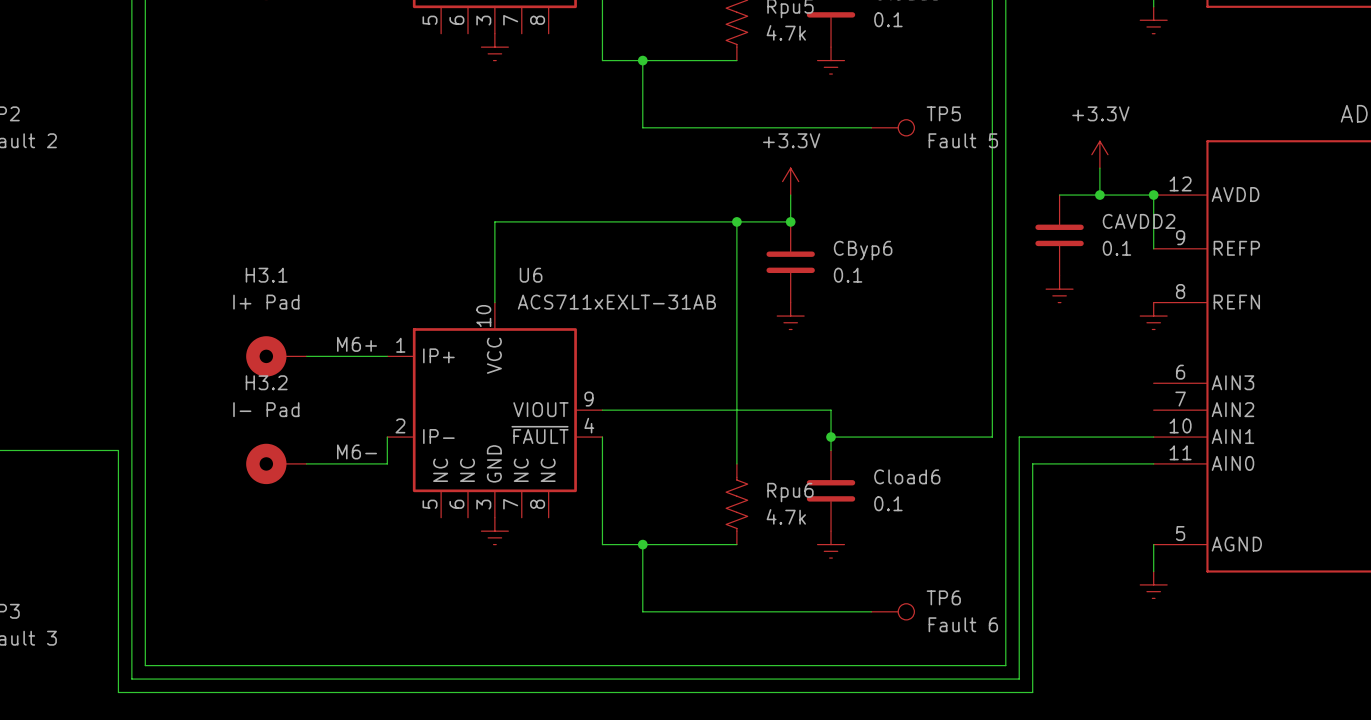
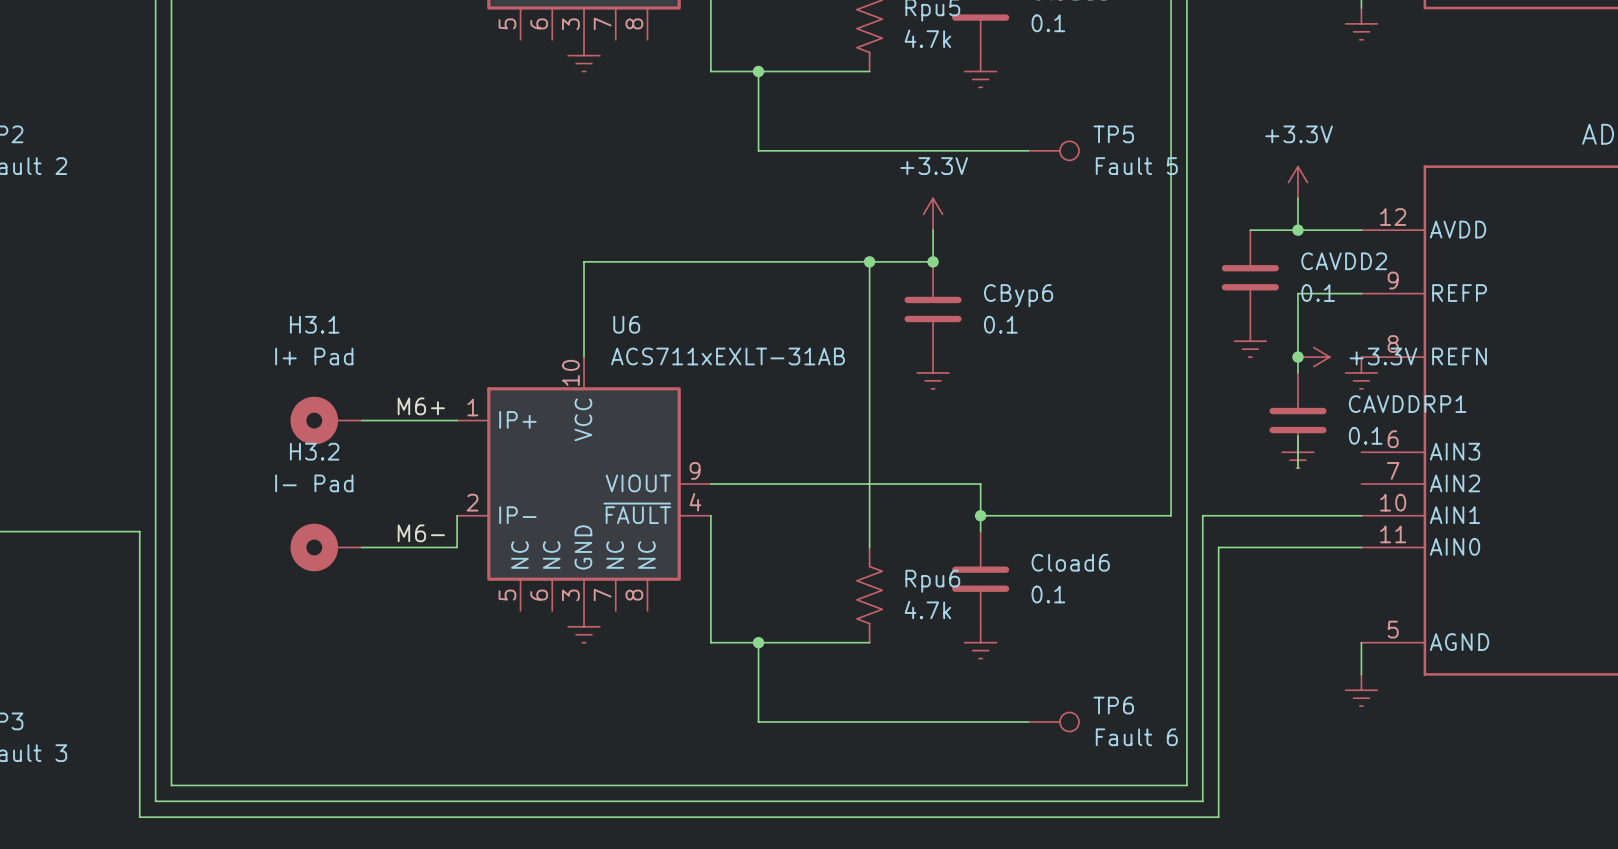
wire: (1153, 195) (1153, 248) -> (1297, 372) (1297, 293) (1361, 293)
junction: (1153, 195) -> none
junction: none -> (1297, 357)
power symbol: none -> +3.3V (1313, 357)
CAVDDRP1: none -> 0.1 (1297, 420)
wire: none -> (1297, 436) (1297, 468)
power symbol: none -> (1297, 452)

